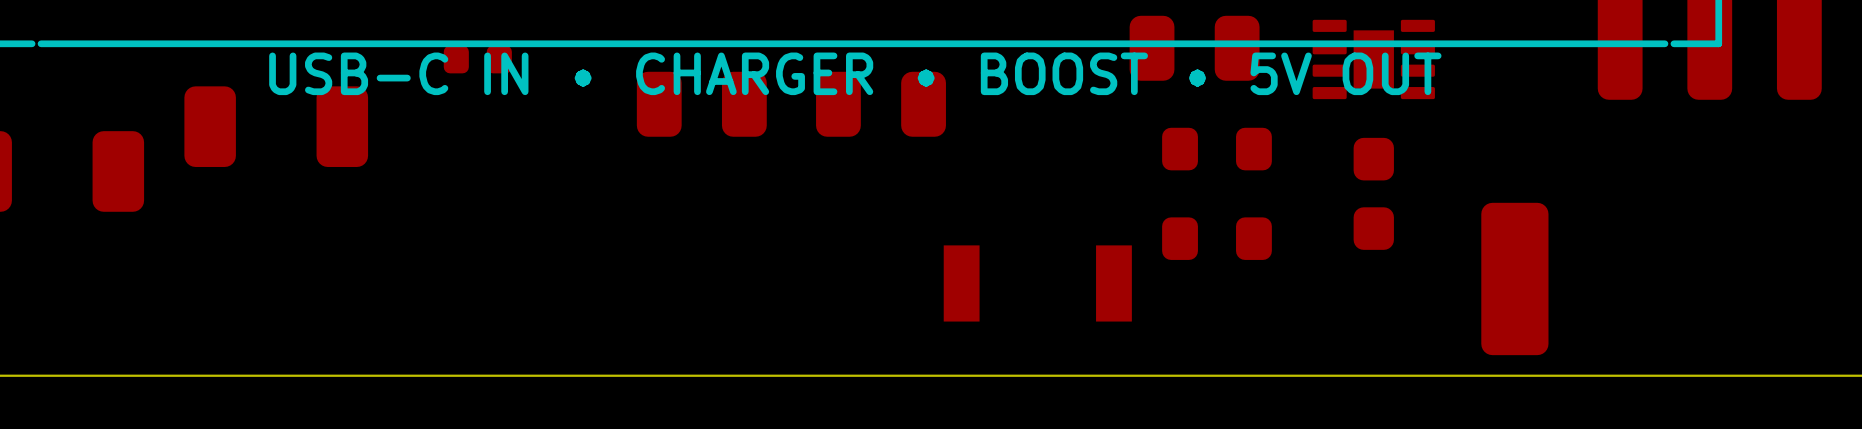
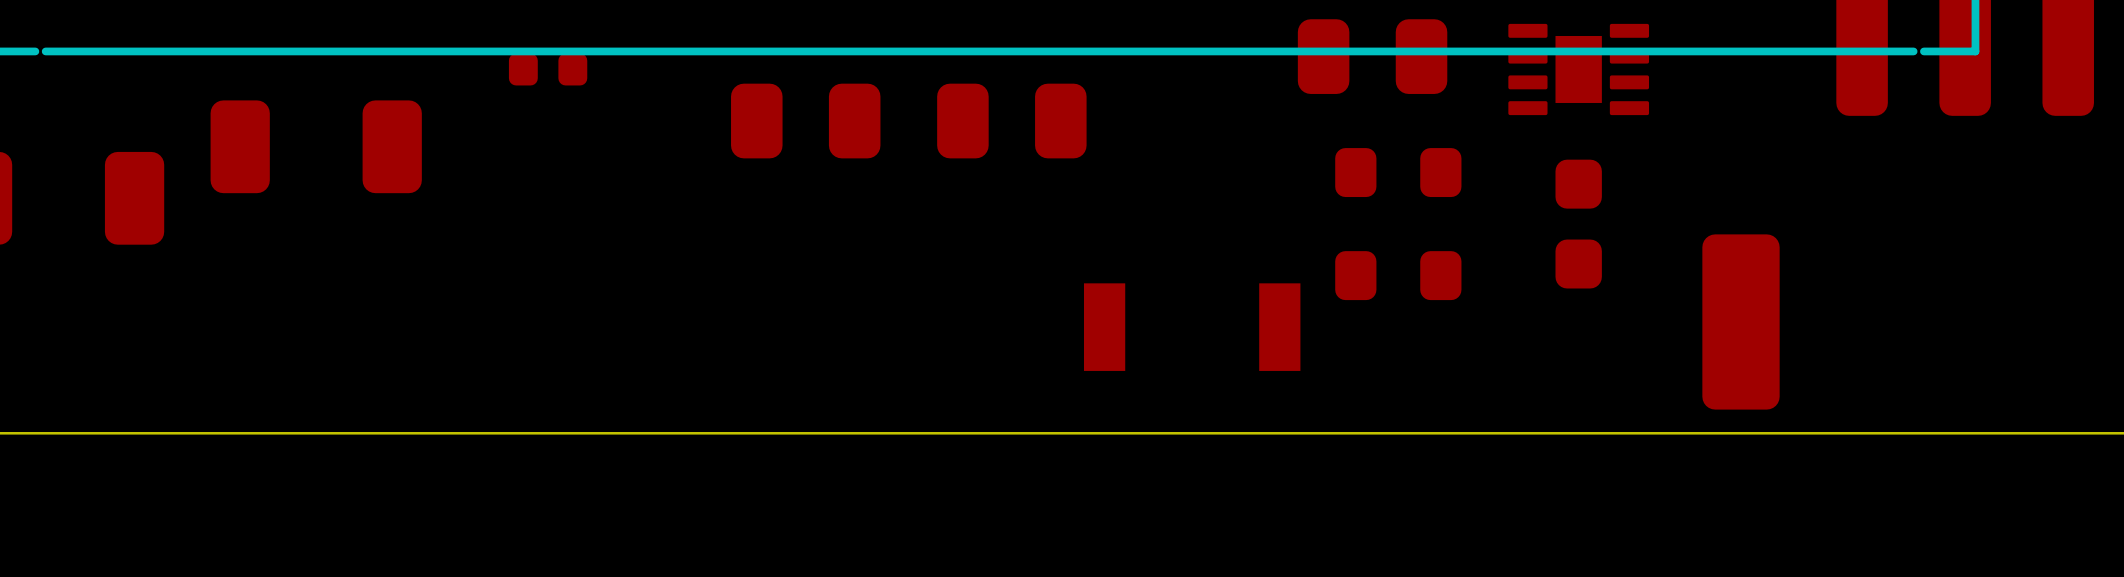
text: USB-C IN • CHARGER • BOOST • 5V OUT (855, 73) -> none

